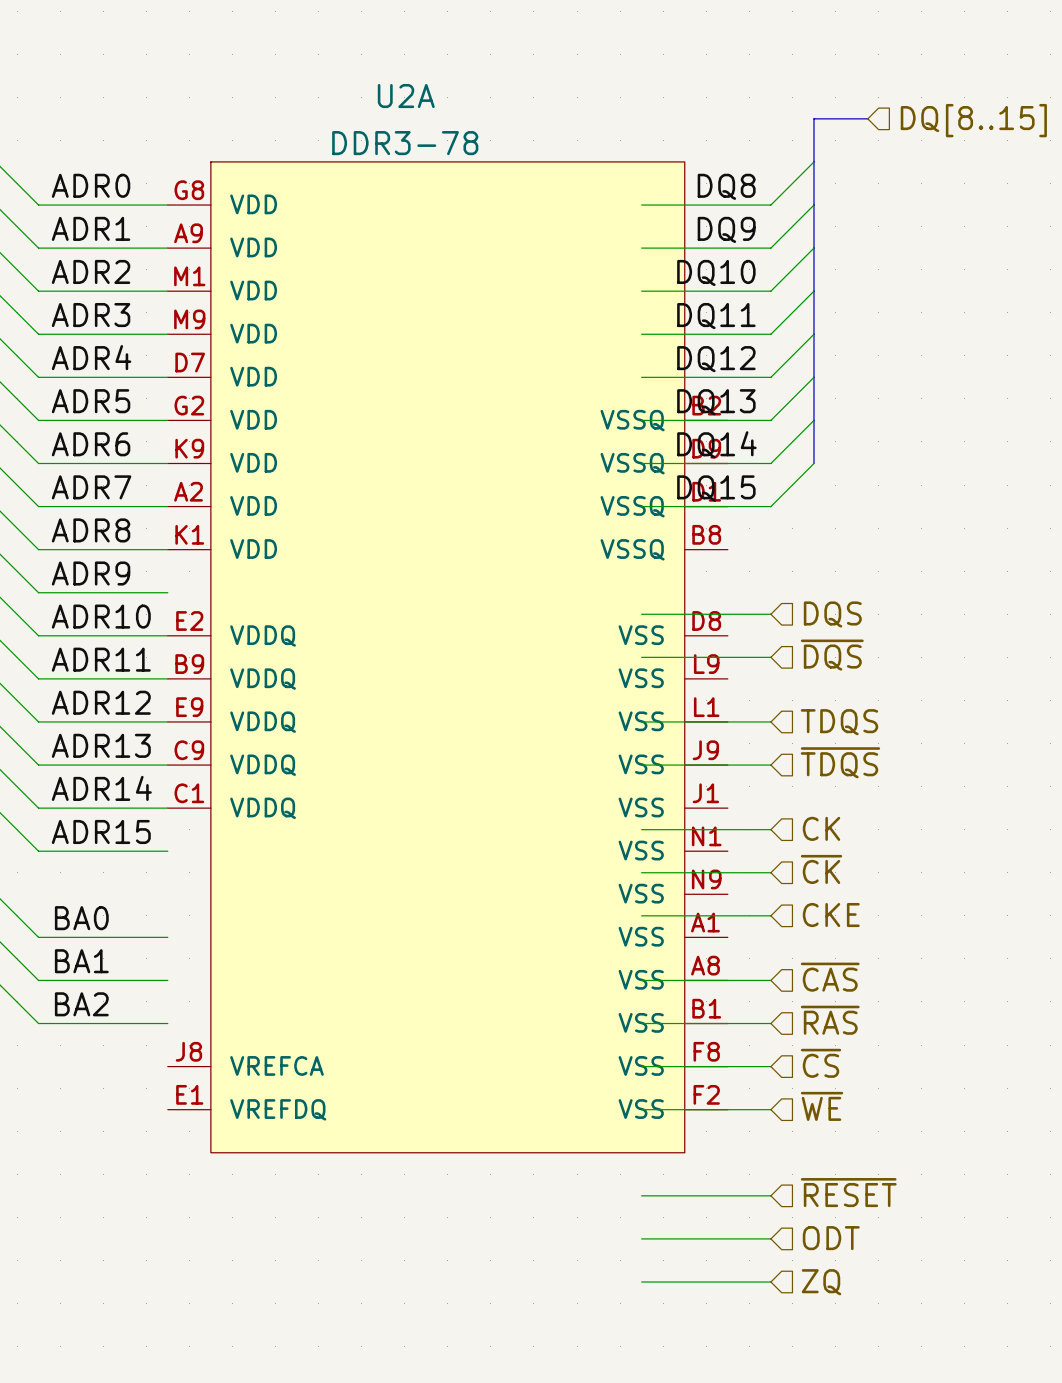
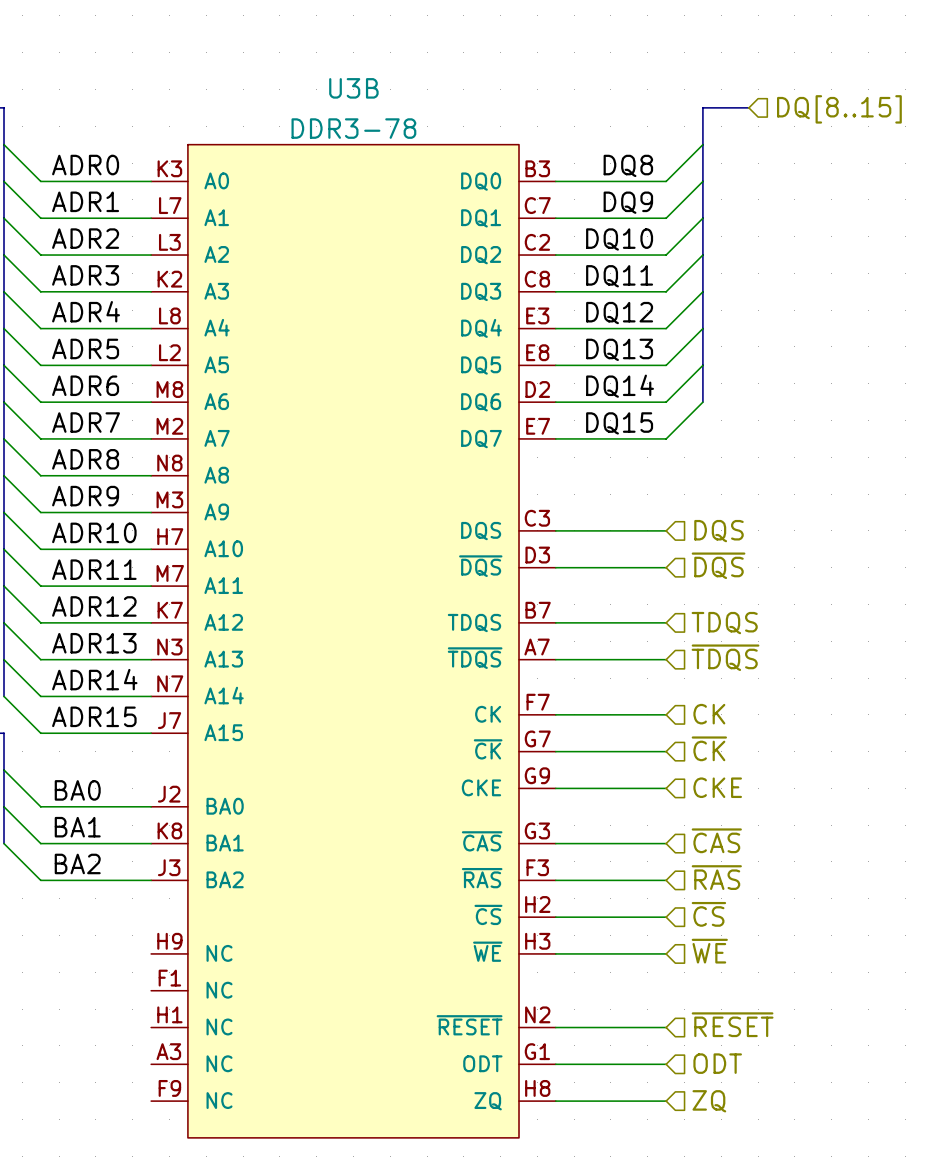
U2A: DDR3-78 (447, 657) -> none
U3B: none -> DDR3-78 (353, 641)

